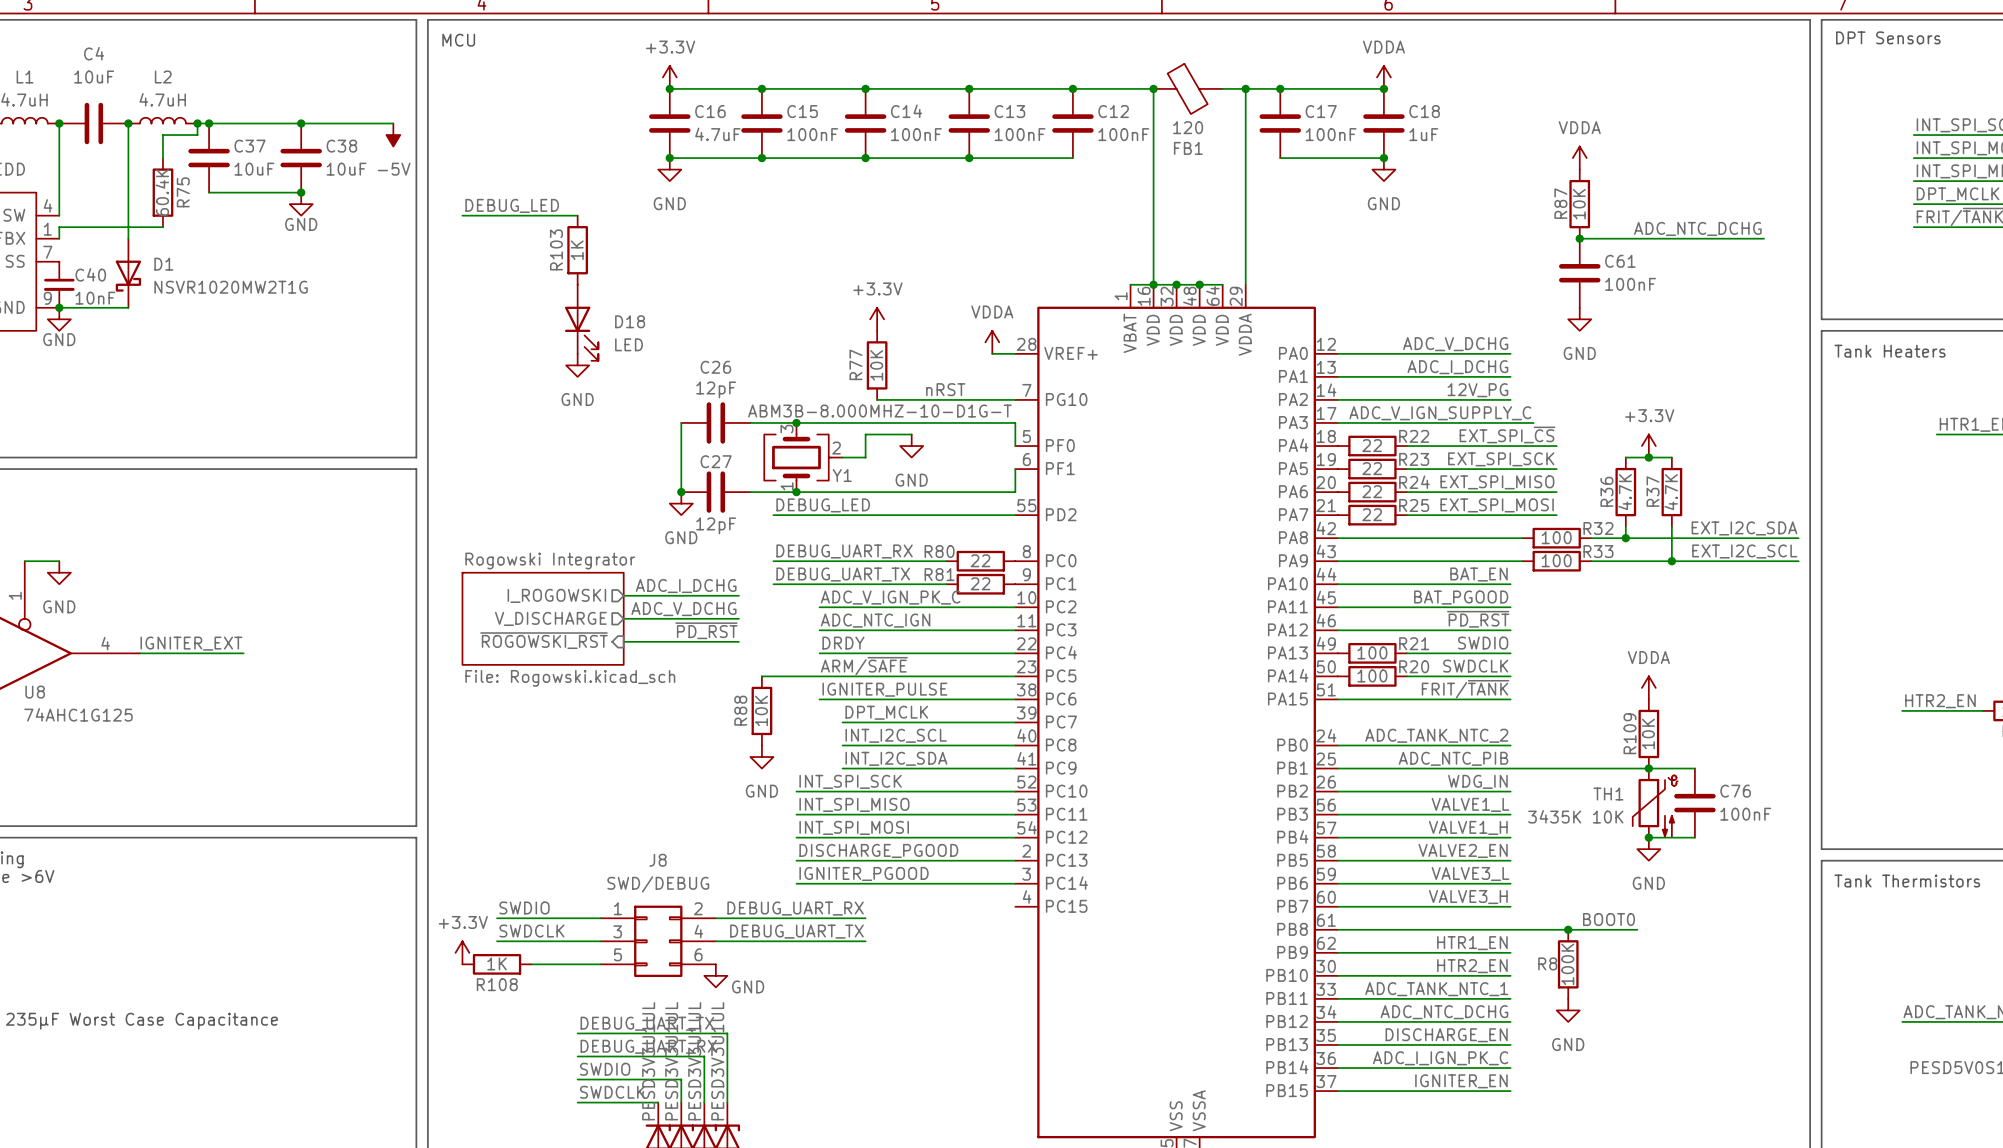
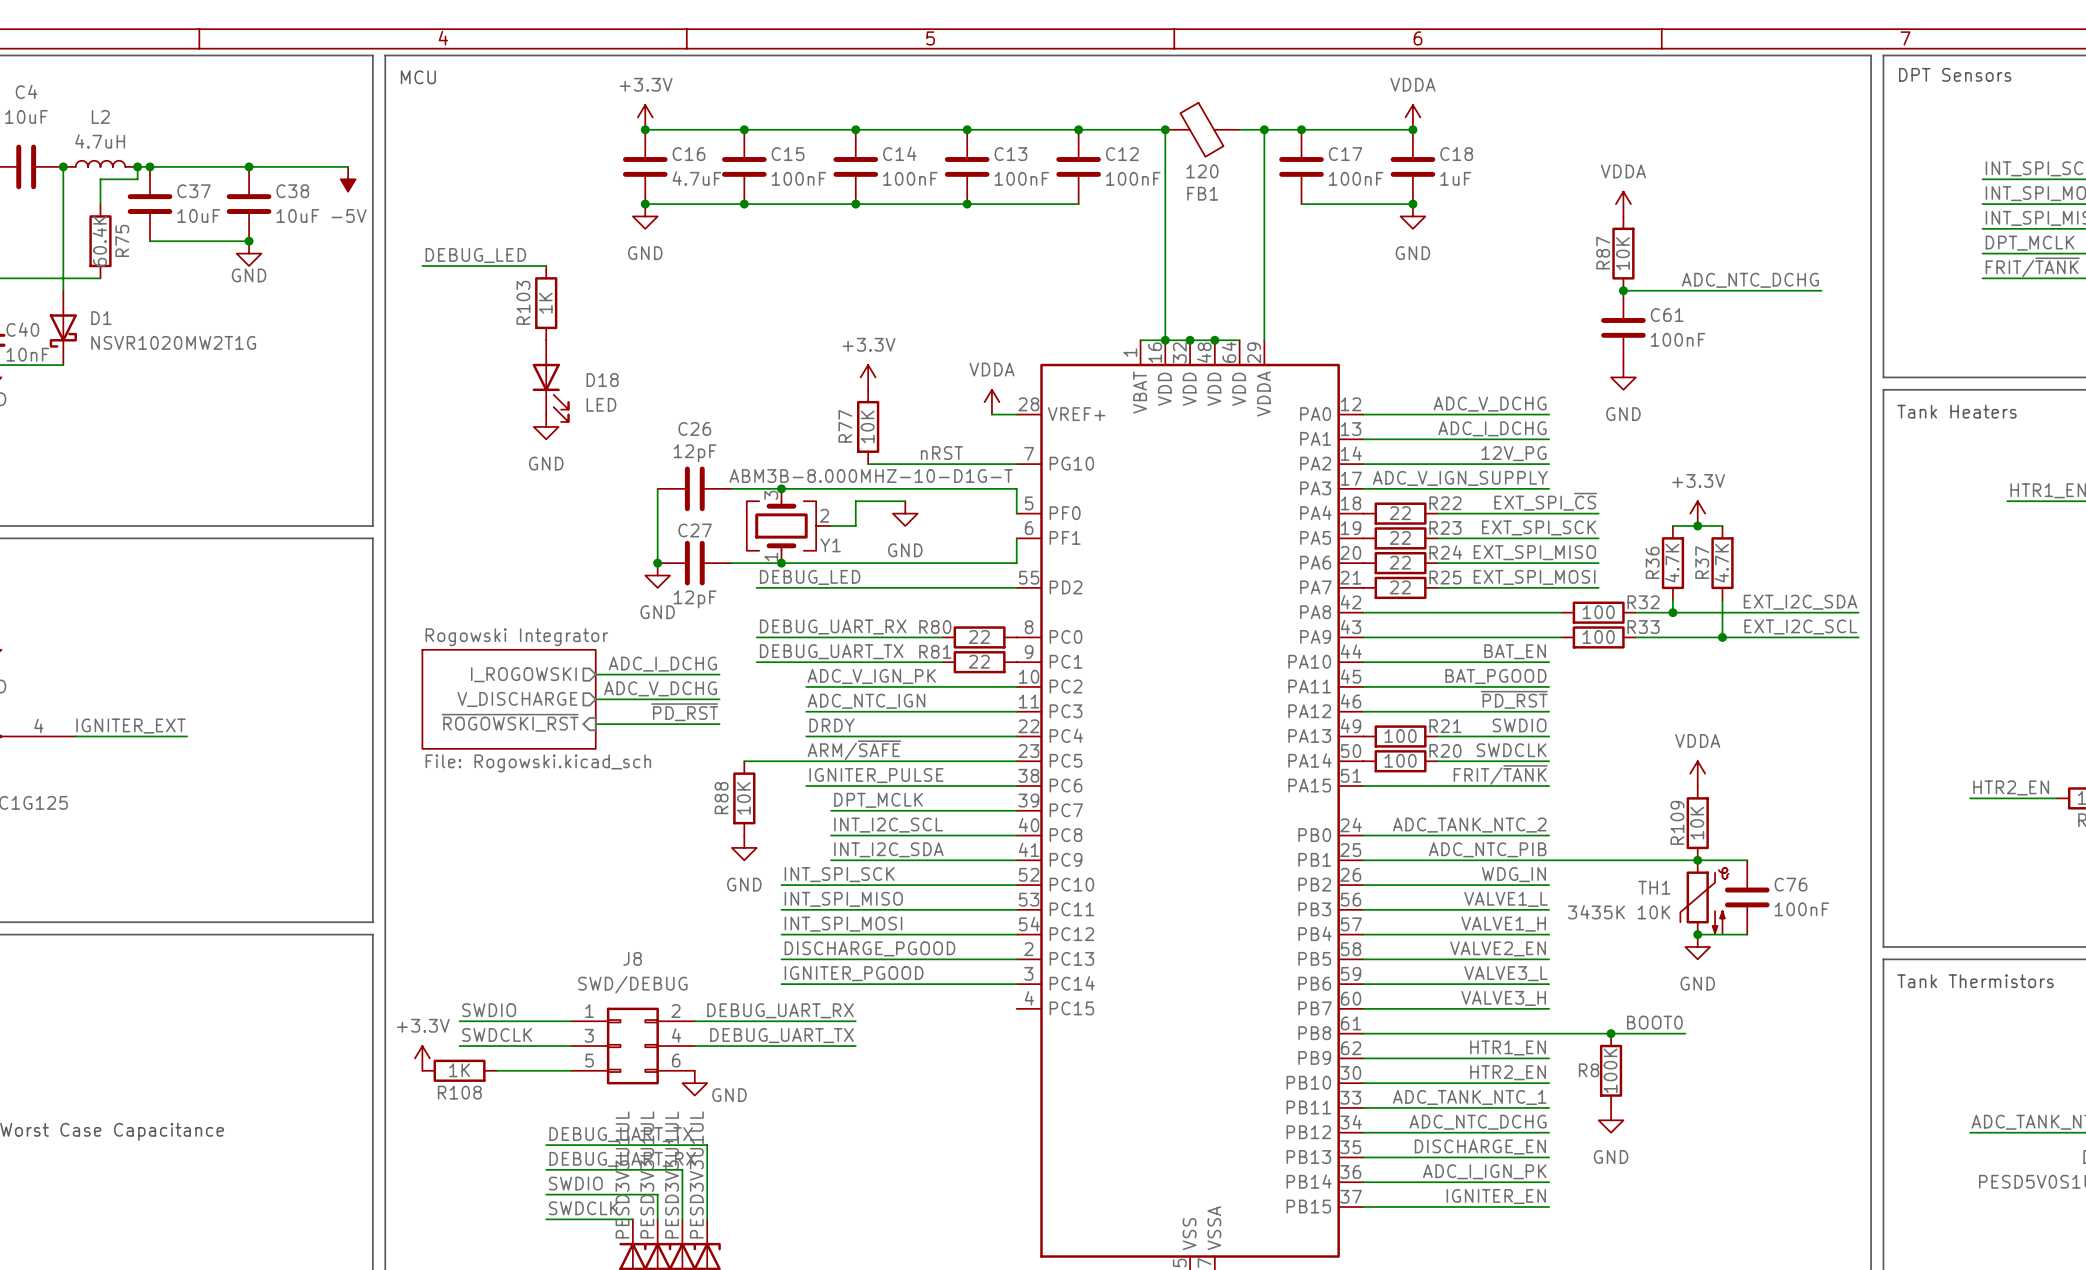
label: ADC_V_IGN_SUPPLY_C (1440, 413) -> ADC_V_IGN_SUPPLY (1460, 478)
wire: (1510, 422) (1533, 422) -> none
label: ADC_V_IGN_PK_C (890, 597) -> ADC_V_IGN_PK (871, 676)
label: ADC_I_IGN_PK_C (1440, 1058) -> ADC_I_IGN_PK (1484, 1171)

